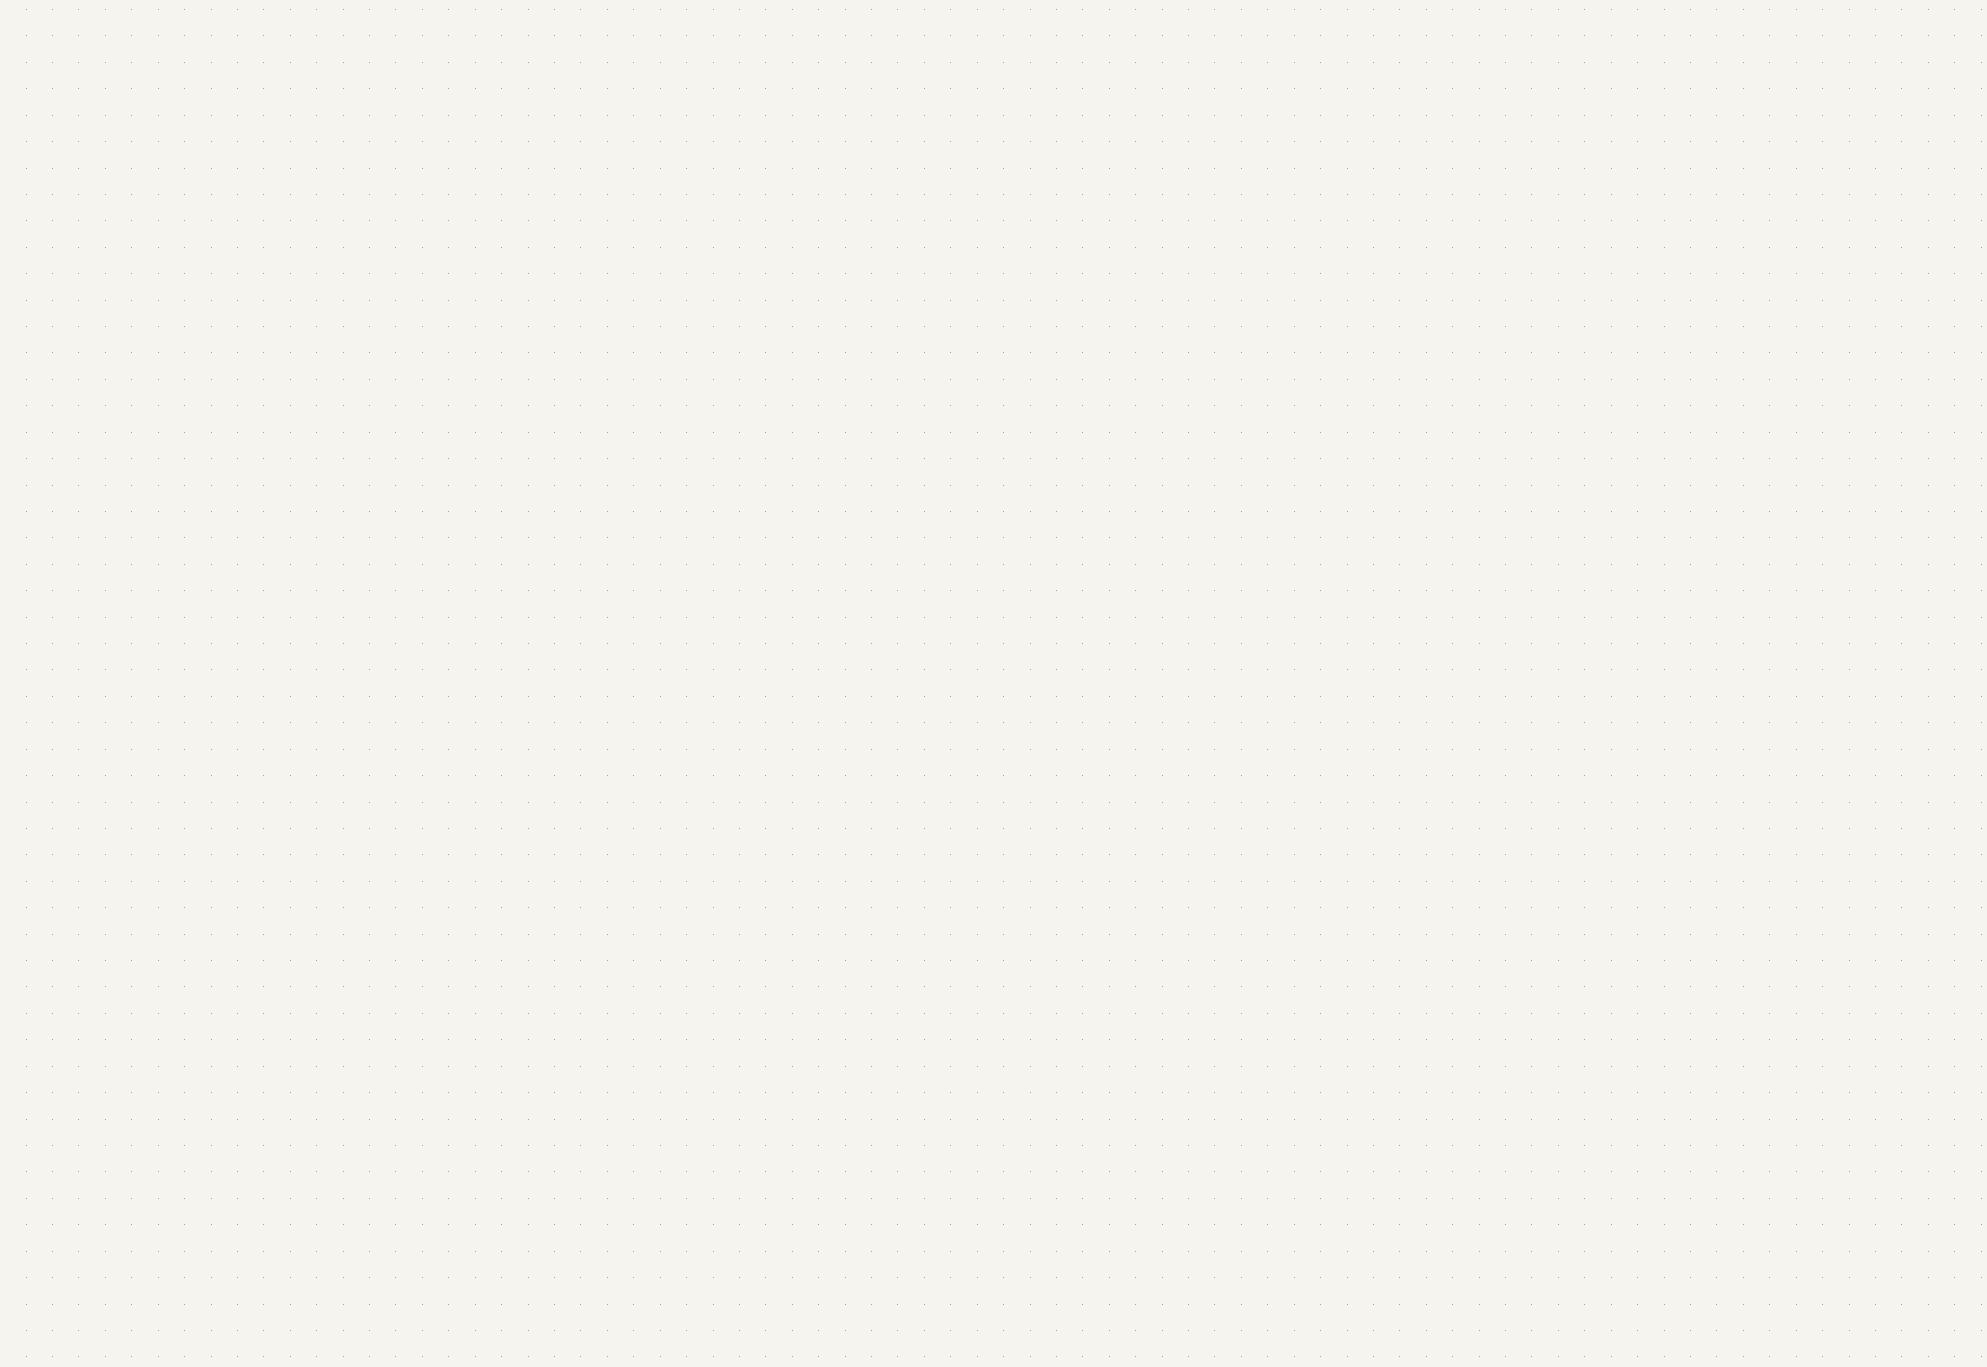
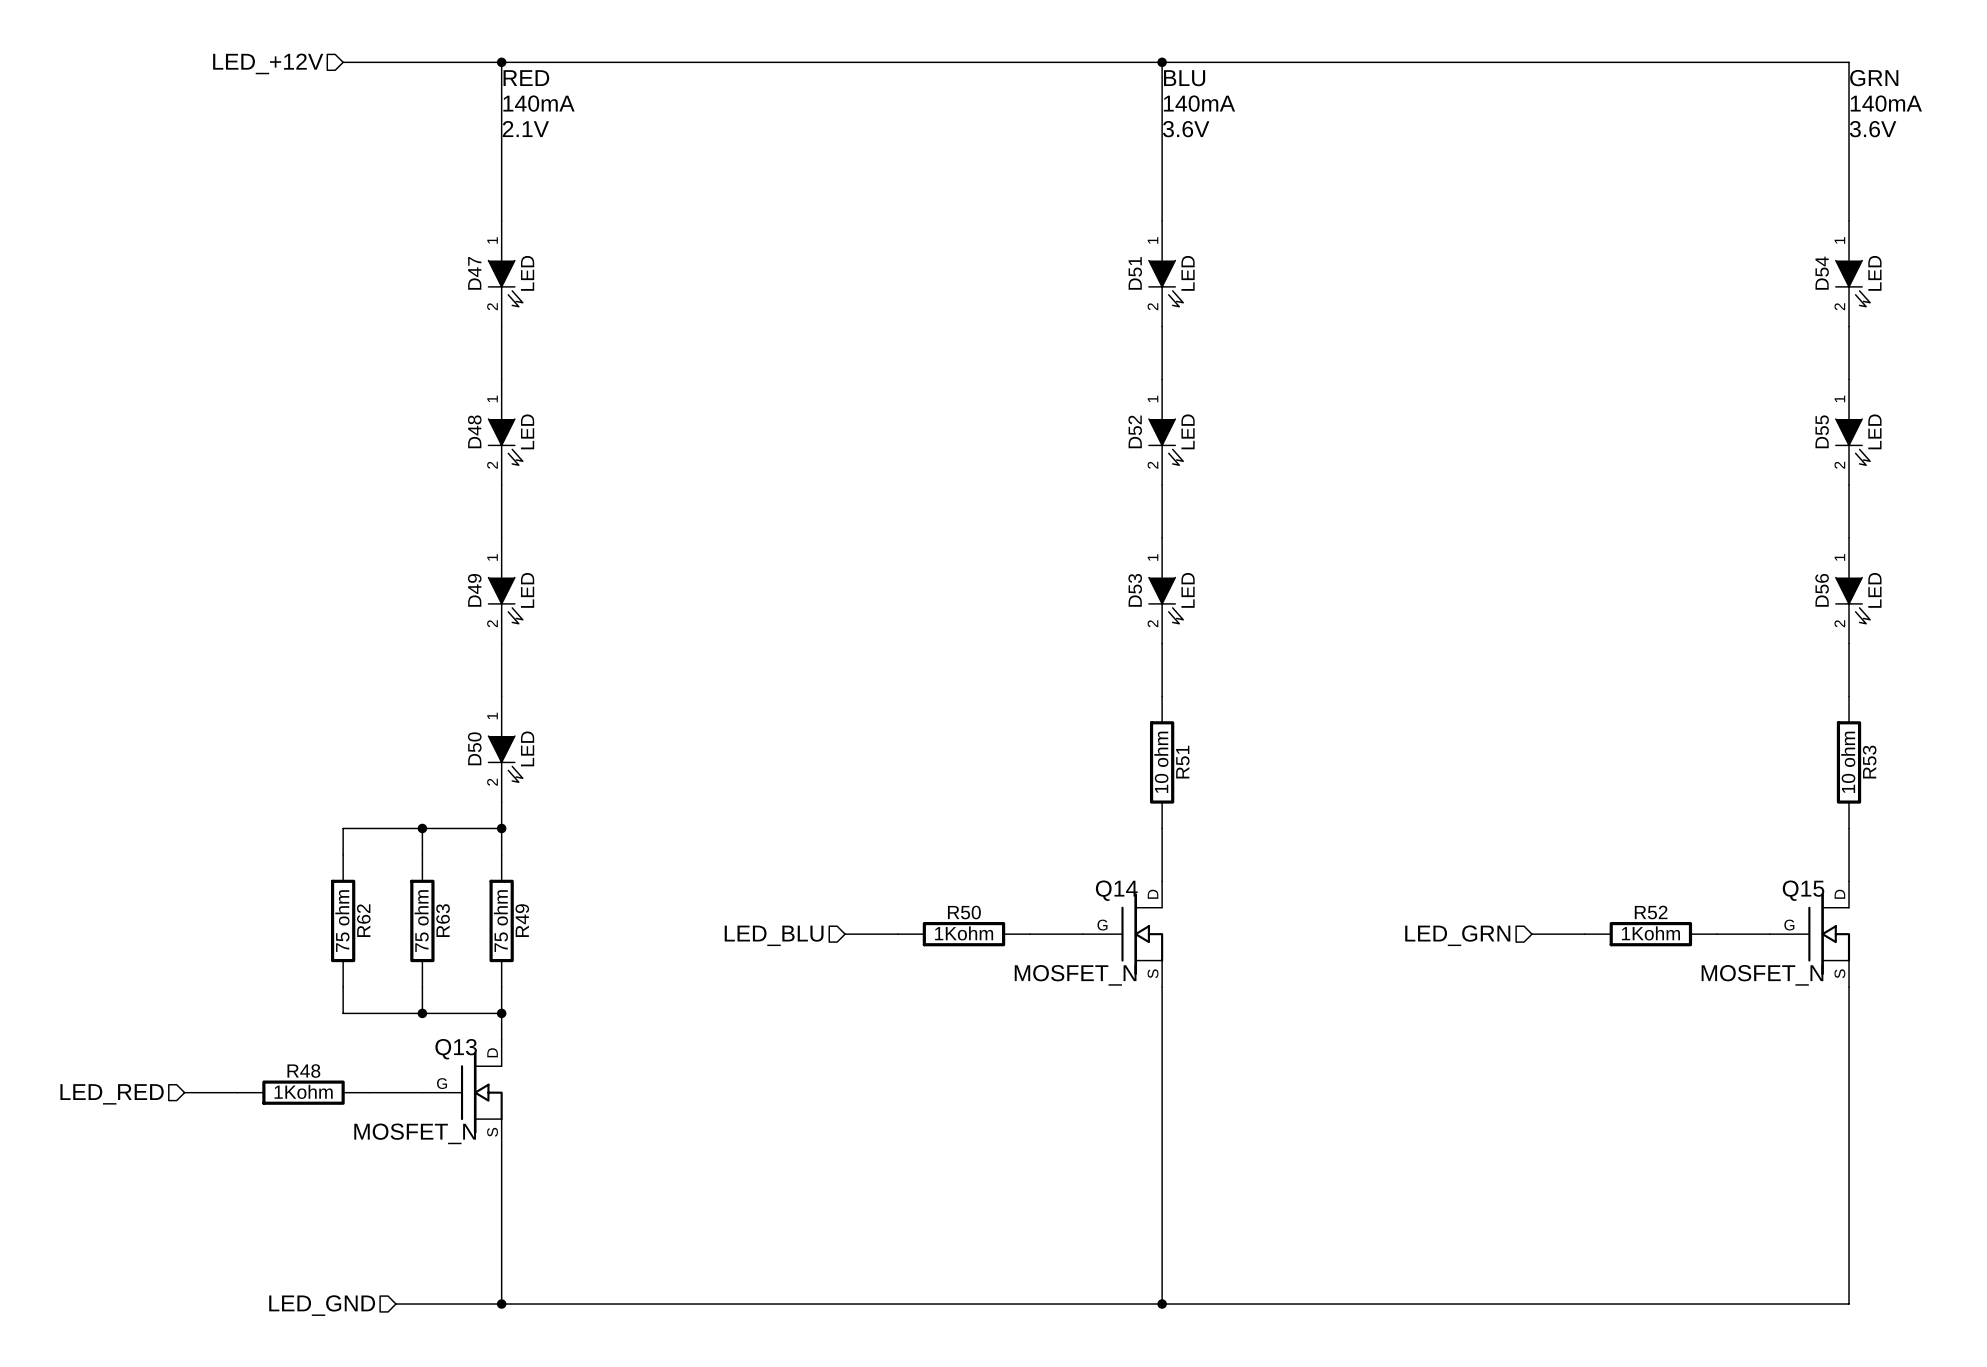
hierarchical label: none -> LED_+12V (268, 63)
wire: none -> (343, 62) (1849, 62) (1849, 220)
wire: none -> (501, 62) (501, 220)
junction: none -> (501, 62)
wire: none -> (1162, 62) (1162, 220)
junction: none -> (1162, 62)
text: none -> RED (526, 78)
text: none -> BLU (1184, 78)
text: none -> GRN (1874, 78)
text: none -> 140mA (539, 103)
text: none -> 140mA (1199, 103)
text: none -> 140mA (1886, 103)
text: none -> 2.1V (525, 129)
text: none -> 3.6V (1186, 129)
text: none -> 3.6V (1873, 129)
D47: none -> LED (505, 273)
D51: none -> LED (1166, 273)
D54: none -> LED (1852, 273)
wire: none -> (501, 326) (501, 379)
wire: none -> (1162, 326) (1162, 379)
wire: none -> (1849, 326) (1849, 379)
D48: none -> LED (505, 432)
D52: none -> LED (1166, 432)
D55: none -> LED (1852, 432)
wire: none -> (501, 485) (501, 537)
wire: none -> (1162, 485) (1162, 537)
wire: none -> (1849, 485) (1849, 537)
D49: none -> LED (505, 590)
D53: none -> LED (1166, 590)
D56: none -> LED (1852, 590)
wire: none -> (501, 643) (501, 696)
wire: none -> (1162, 643) (1162, 696)
wire: none -> (1849, 643) (1849, 696)
D50: none -> LED (505, 749)
R51: none -> 10 ohm (1162, 762)
R53: none -> 10 ohm (1849, 762)
wire: none -> (501, 802) (501, 854)
wire: none -> (422, 828) (422, 854)
junction: none -> (422, 828)
wire: none -> (501, 828) (343, 828) (343, 854)
junction: none -> (501, 828)
wire: none -> (1162, 828) (1162, 881)
wire: none -> (1849, 828) (1849, 881)
R62: none -> 75 ohm (343, 920)
R63: none -> 75 ohm (422, 920)
R49: none -> 75 ohm (501, 920)
hierarchical label: none -> LED_BLU (774, 935)
wire: none -> (845, 934) (897, 934)
R50: none -> 1Kohm (963, 934)
wire: none -> (1030, 934) (1082, 934)
Q14: none -> MOSFET_N (1123, 934)
hierarchical label: none -> LED_GRN (1457, 935)
wire: none -> (1531, 934) (1584, 934)
R52: none -> 1Kohm (1650, 934)
wire: none -> (1716, 934) (1769, 934)
Q15: none -> MOSFET_N (1809, 934)
wire: none -> (343, 986) (343, 1013) (501, 1013)
wire: none -> (422, 986) (422, 1013)
wire: none -> (501, 986) (501, 1039)
wire: none -> (1162, 986) (1162, 1304)
wire: none -> (1849, 986) (1849, 1304) (395, 1304)
junction: none -> (422, 1013)
junction: none -> (501, 1013)
hierarchical label: none -> LED_RED (112, 1094)
wire: none -> (184, 1092) (237, 1092)
R48: none -> 1Kohm (303, 1092)
wire: none -> (369, 1092) (422, 1092)
Q13: none -> MOSFET_N (462, 1092)
wire: none -> (501, 1145) (501, 1304)
hierarchical label: none -> LED_GND (322, 1305)
junction: none -> (501, 1304)
junction: none -> (1162, 1304)

